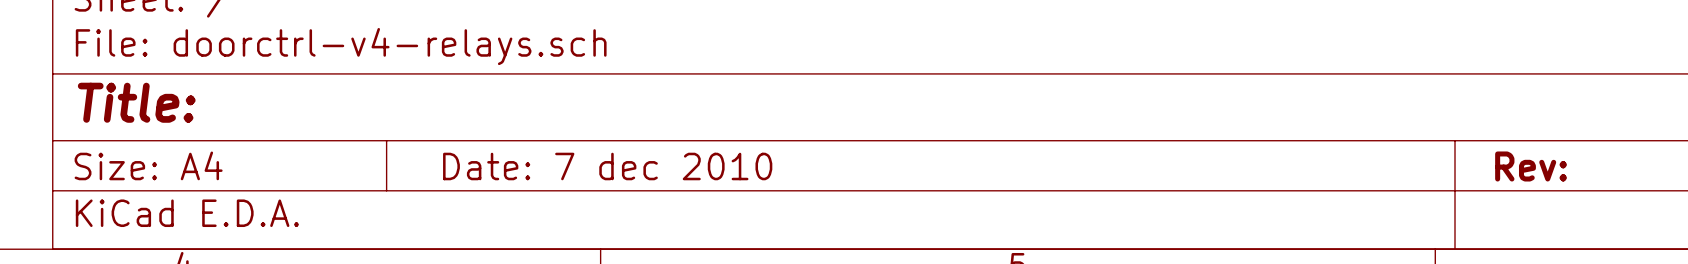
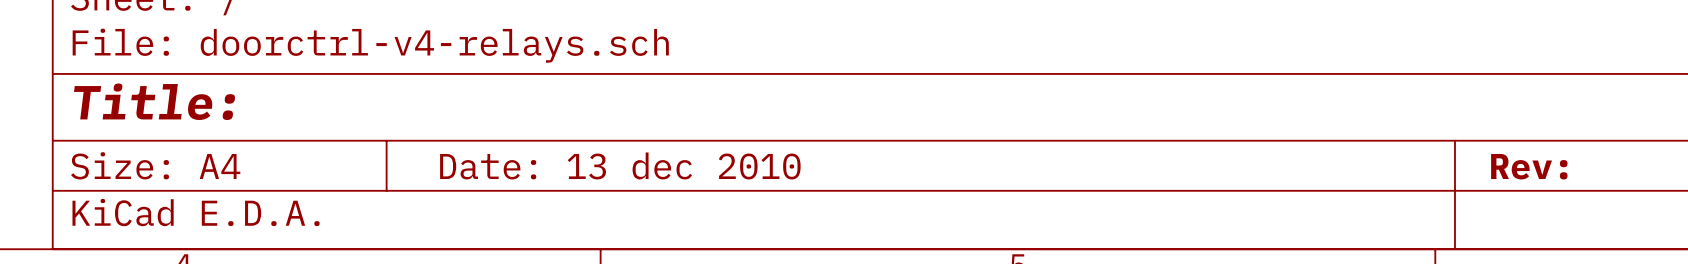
title block: Date: 7 dec 2010 (607, 166) -> Date: 13 dec 2010 (620, 165)

